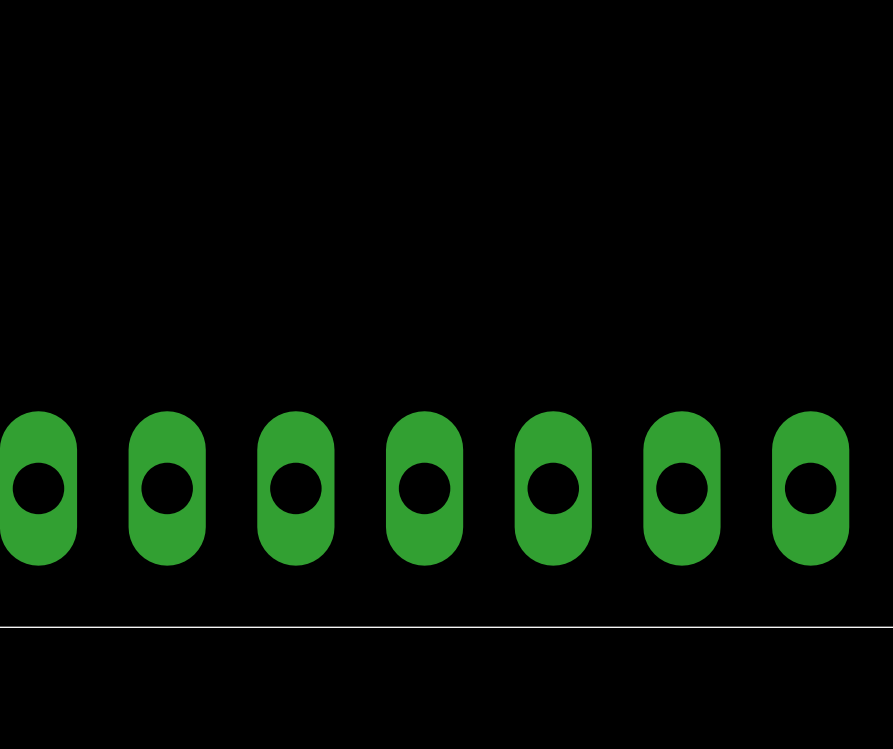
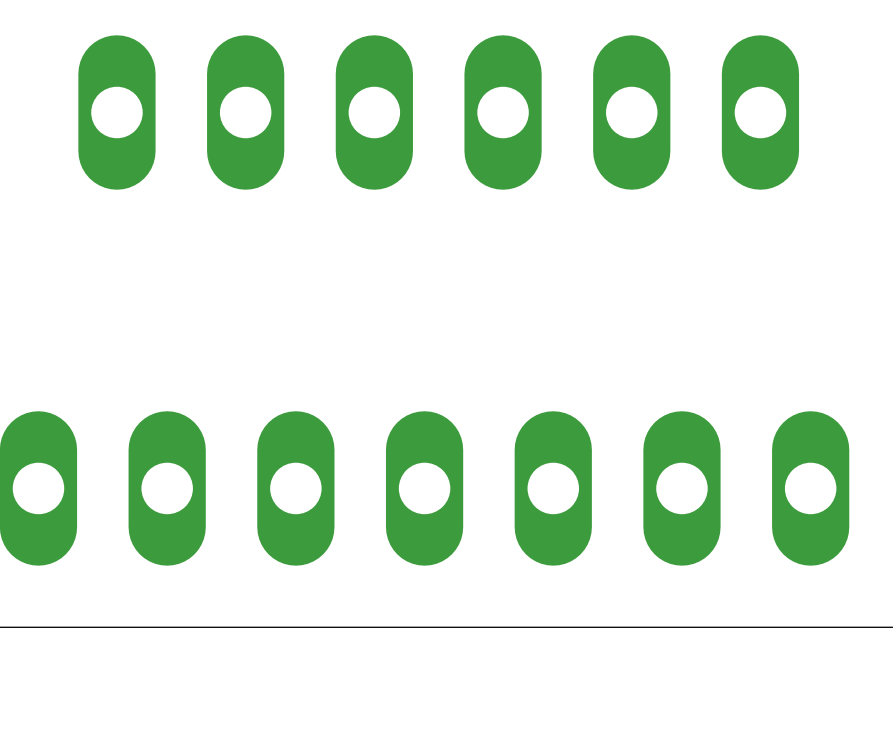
part: none -> (438, 112)

